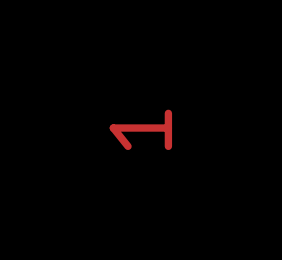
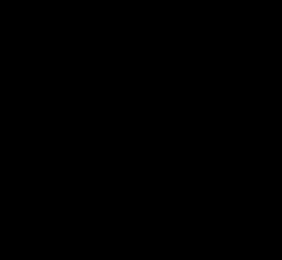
track: (168, 113) (168, 146) -> none
track: (168, 128) (113, 128) (128, 146) -> none

